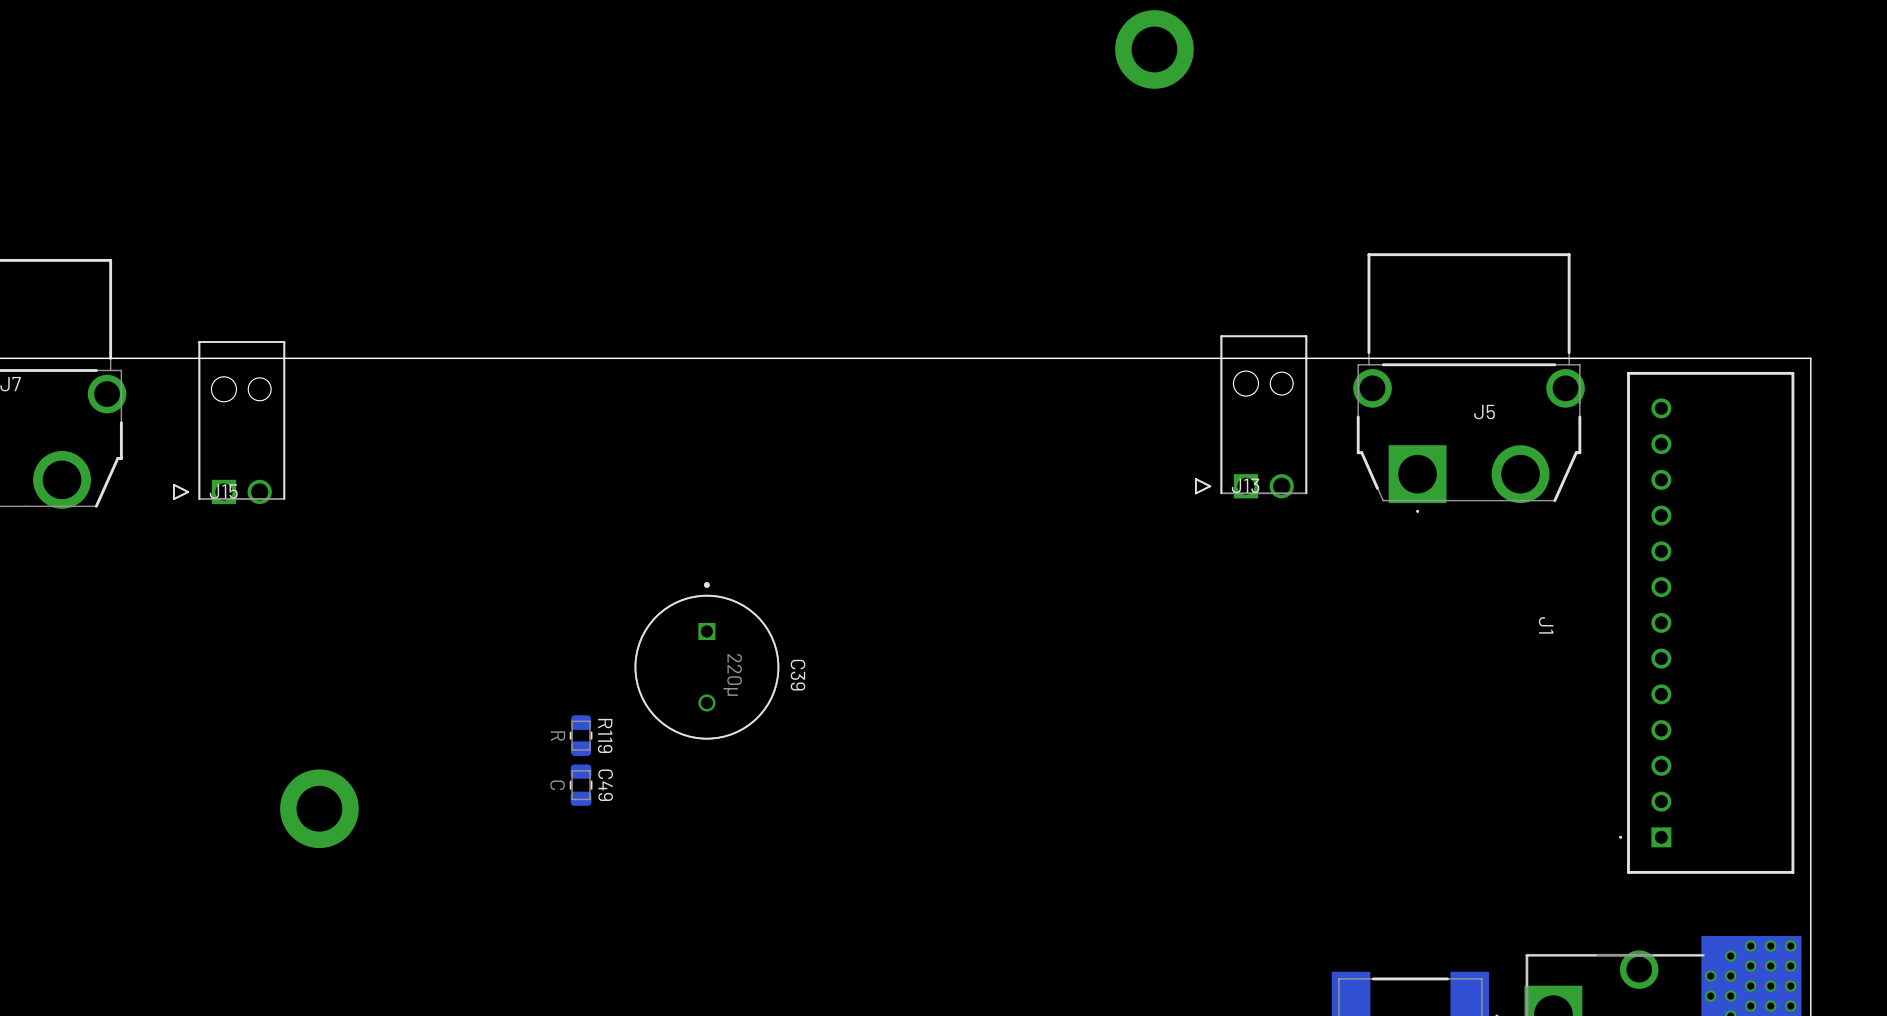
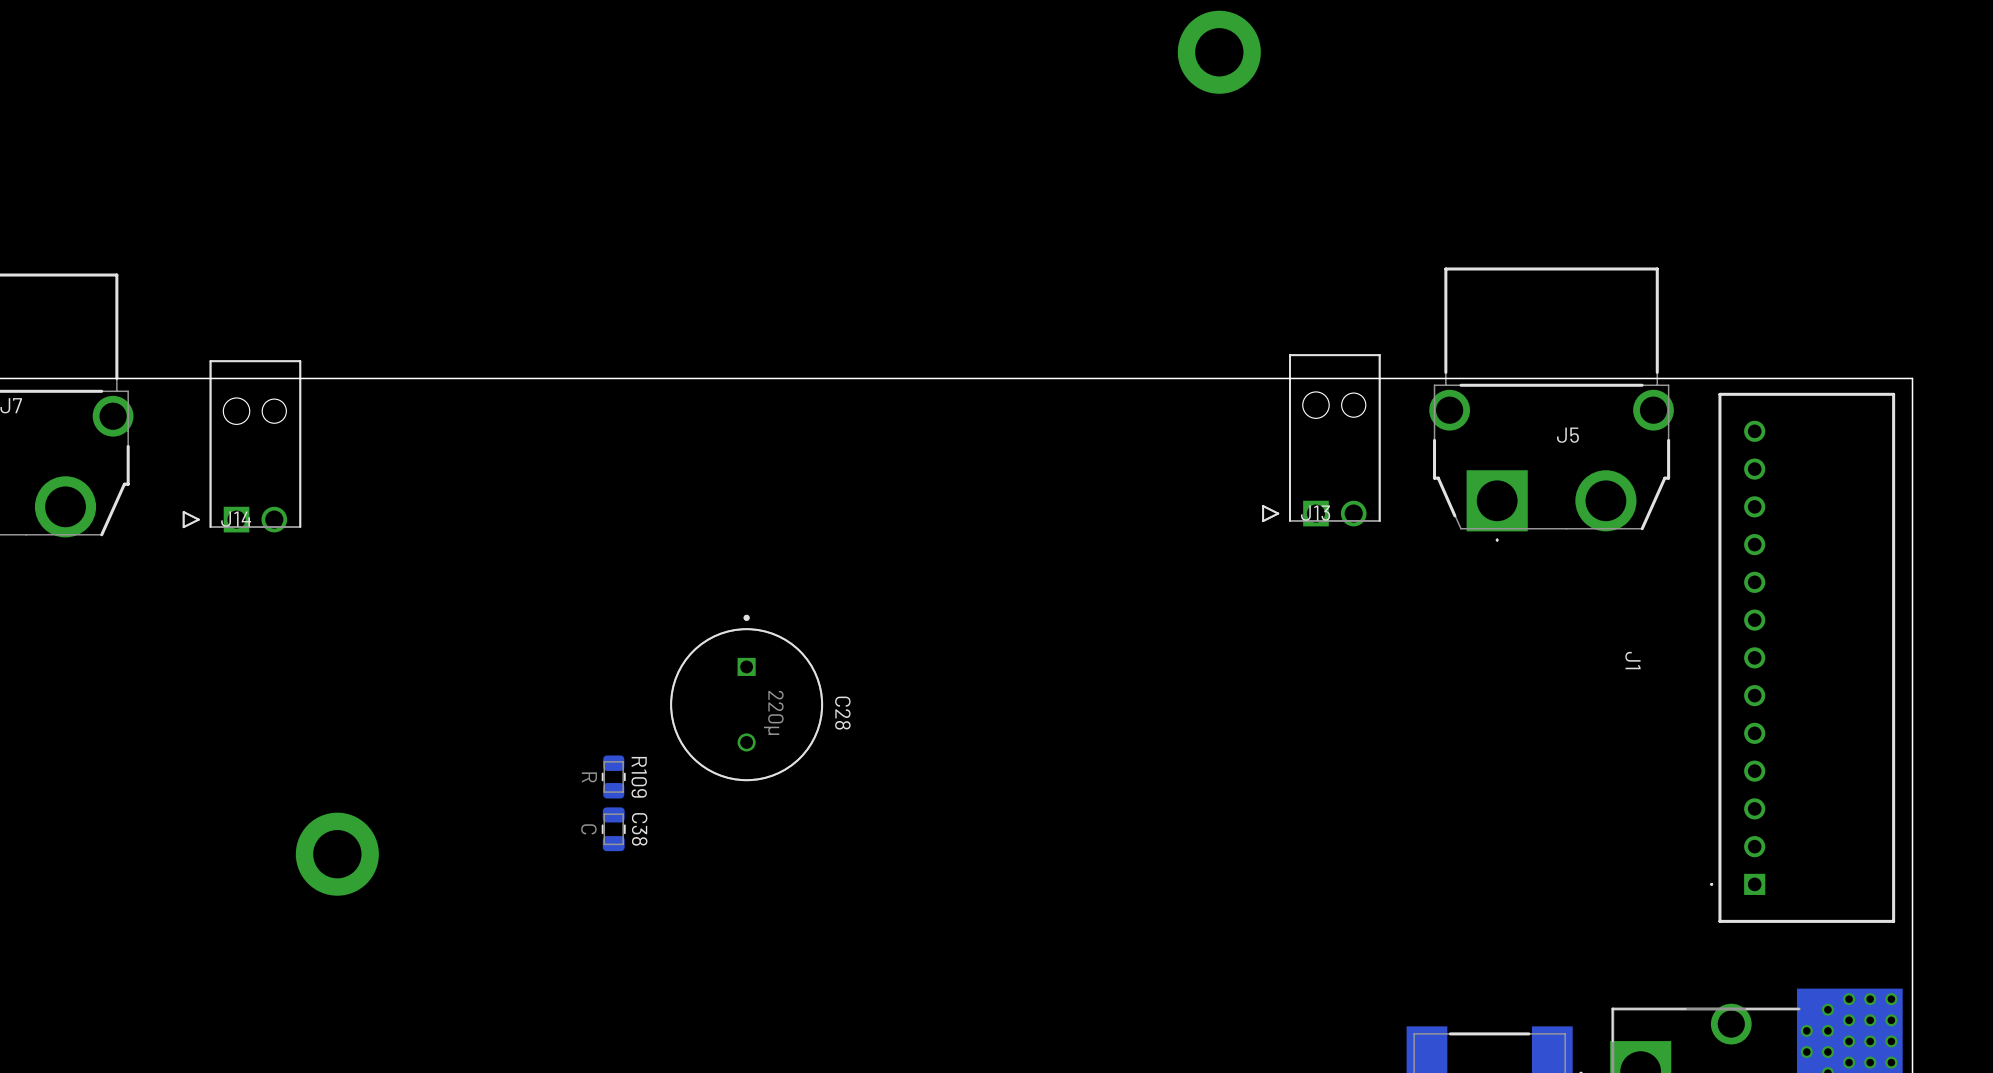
J15 name: J15 (223, 491) -> J14 (236, 519)
C39 name: C39 (798, 675) -> C28 (842, 713)
R119 name: R119 (605, 735) -> R109 (639, 777)
C49 name: C49 (605, 785) -> C38 (639, 829)

